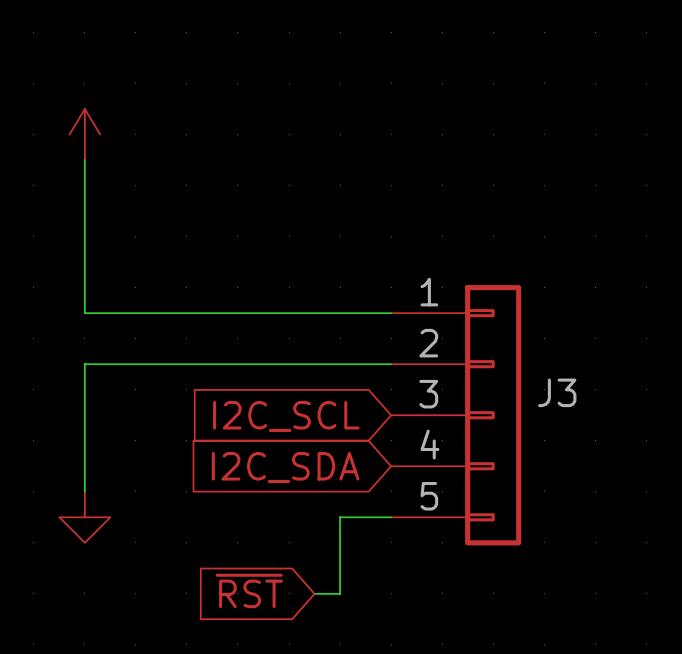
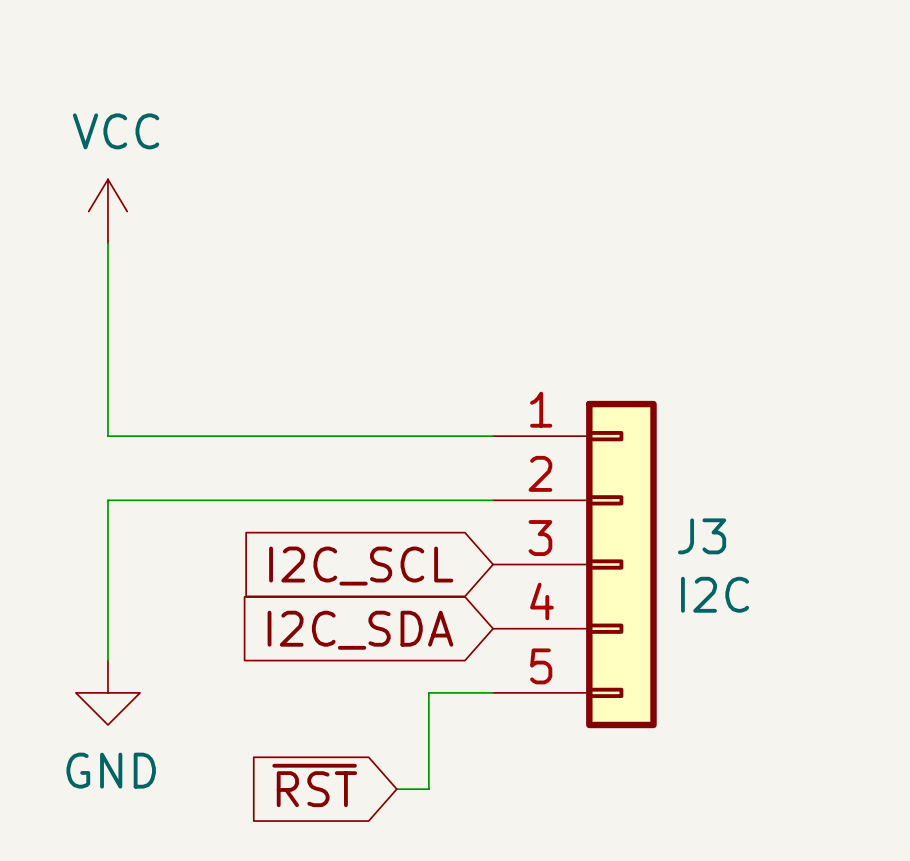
power symbol text: none -> VCC (116, 131)
J3 value: none -> I2C (715, 594)
power symbol text: none -> GND (111, 770)

